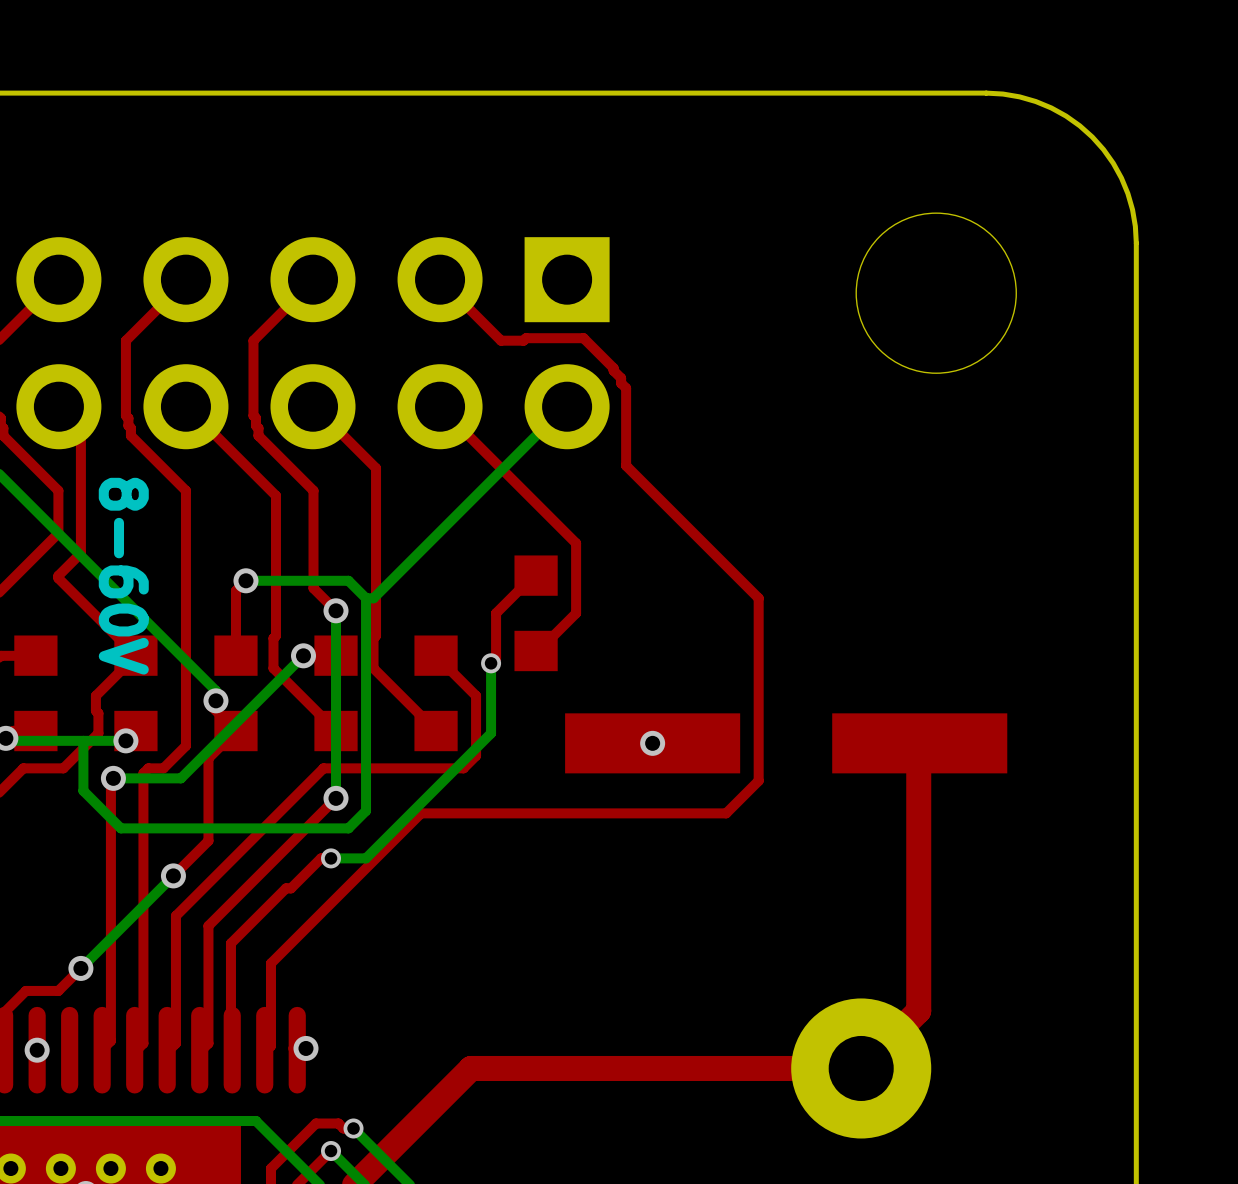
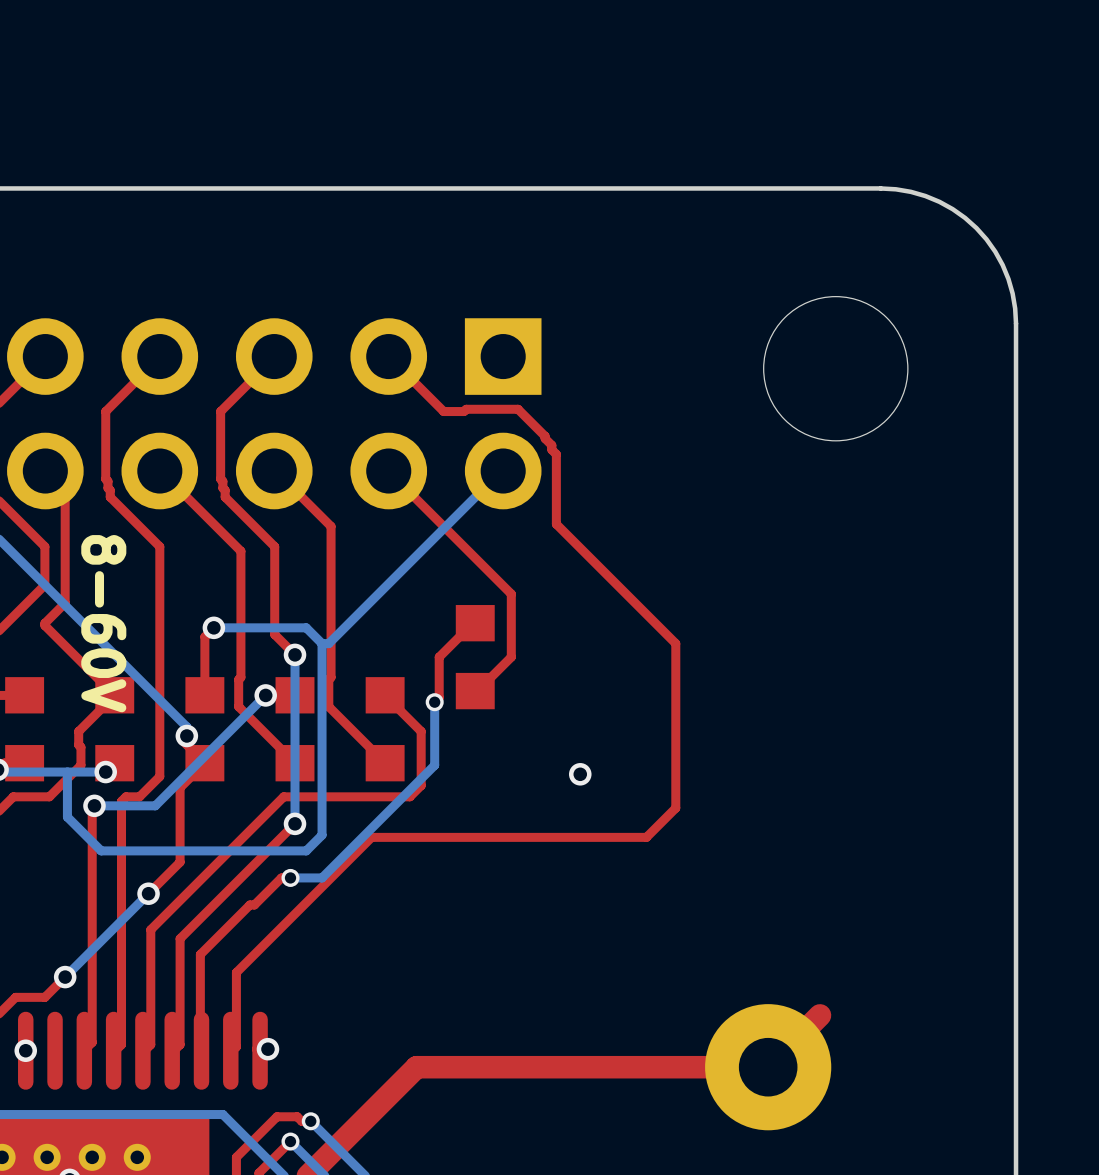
part: (786, 743) -> none
top track: (918, 743) (918, 1010) -> none

